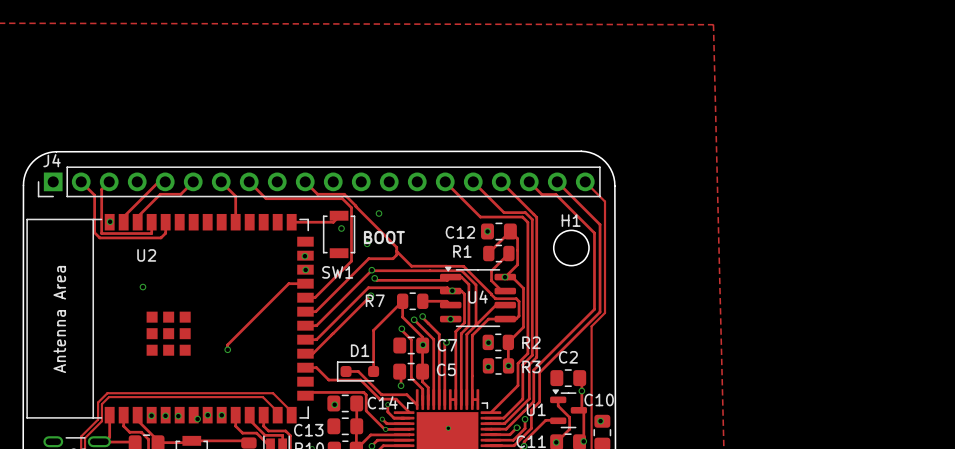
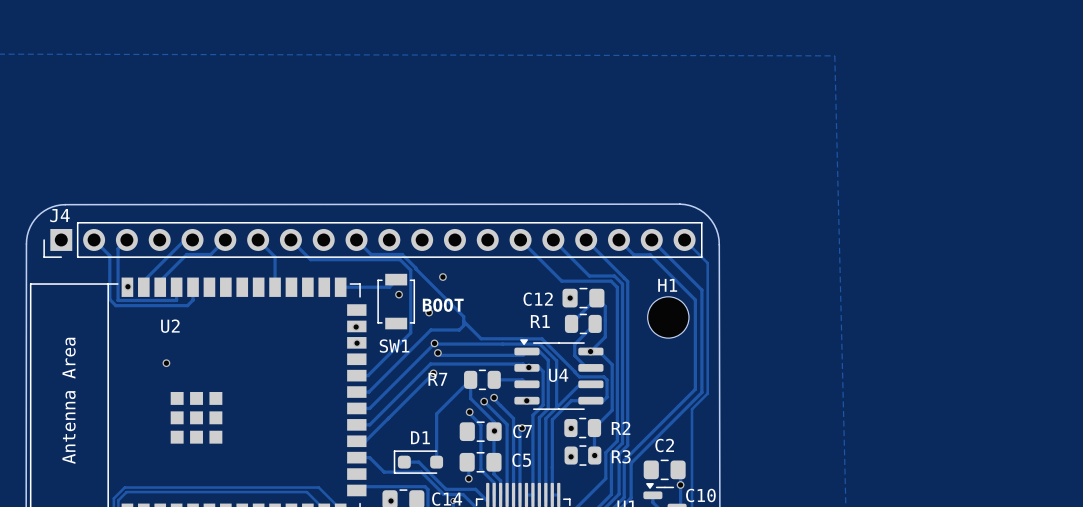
track: (305, 283) (288, 283) (227, 345) (227, 349) -> none
via: (227, 349) -> none

